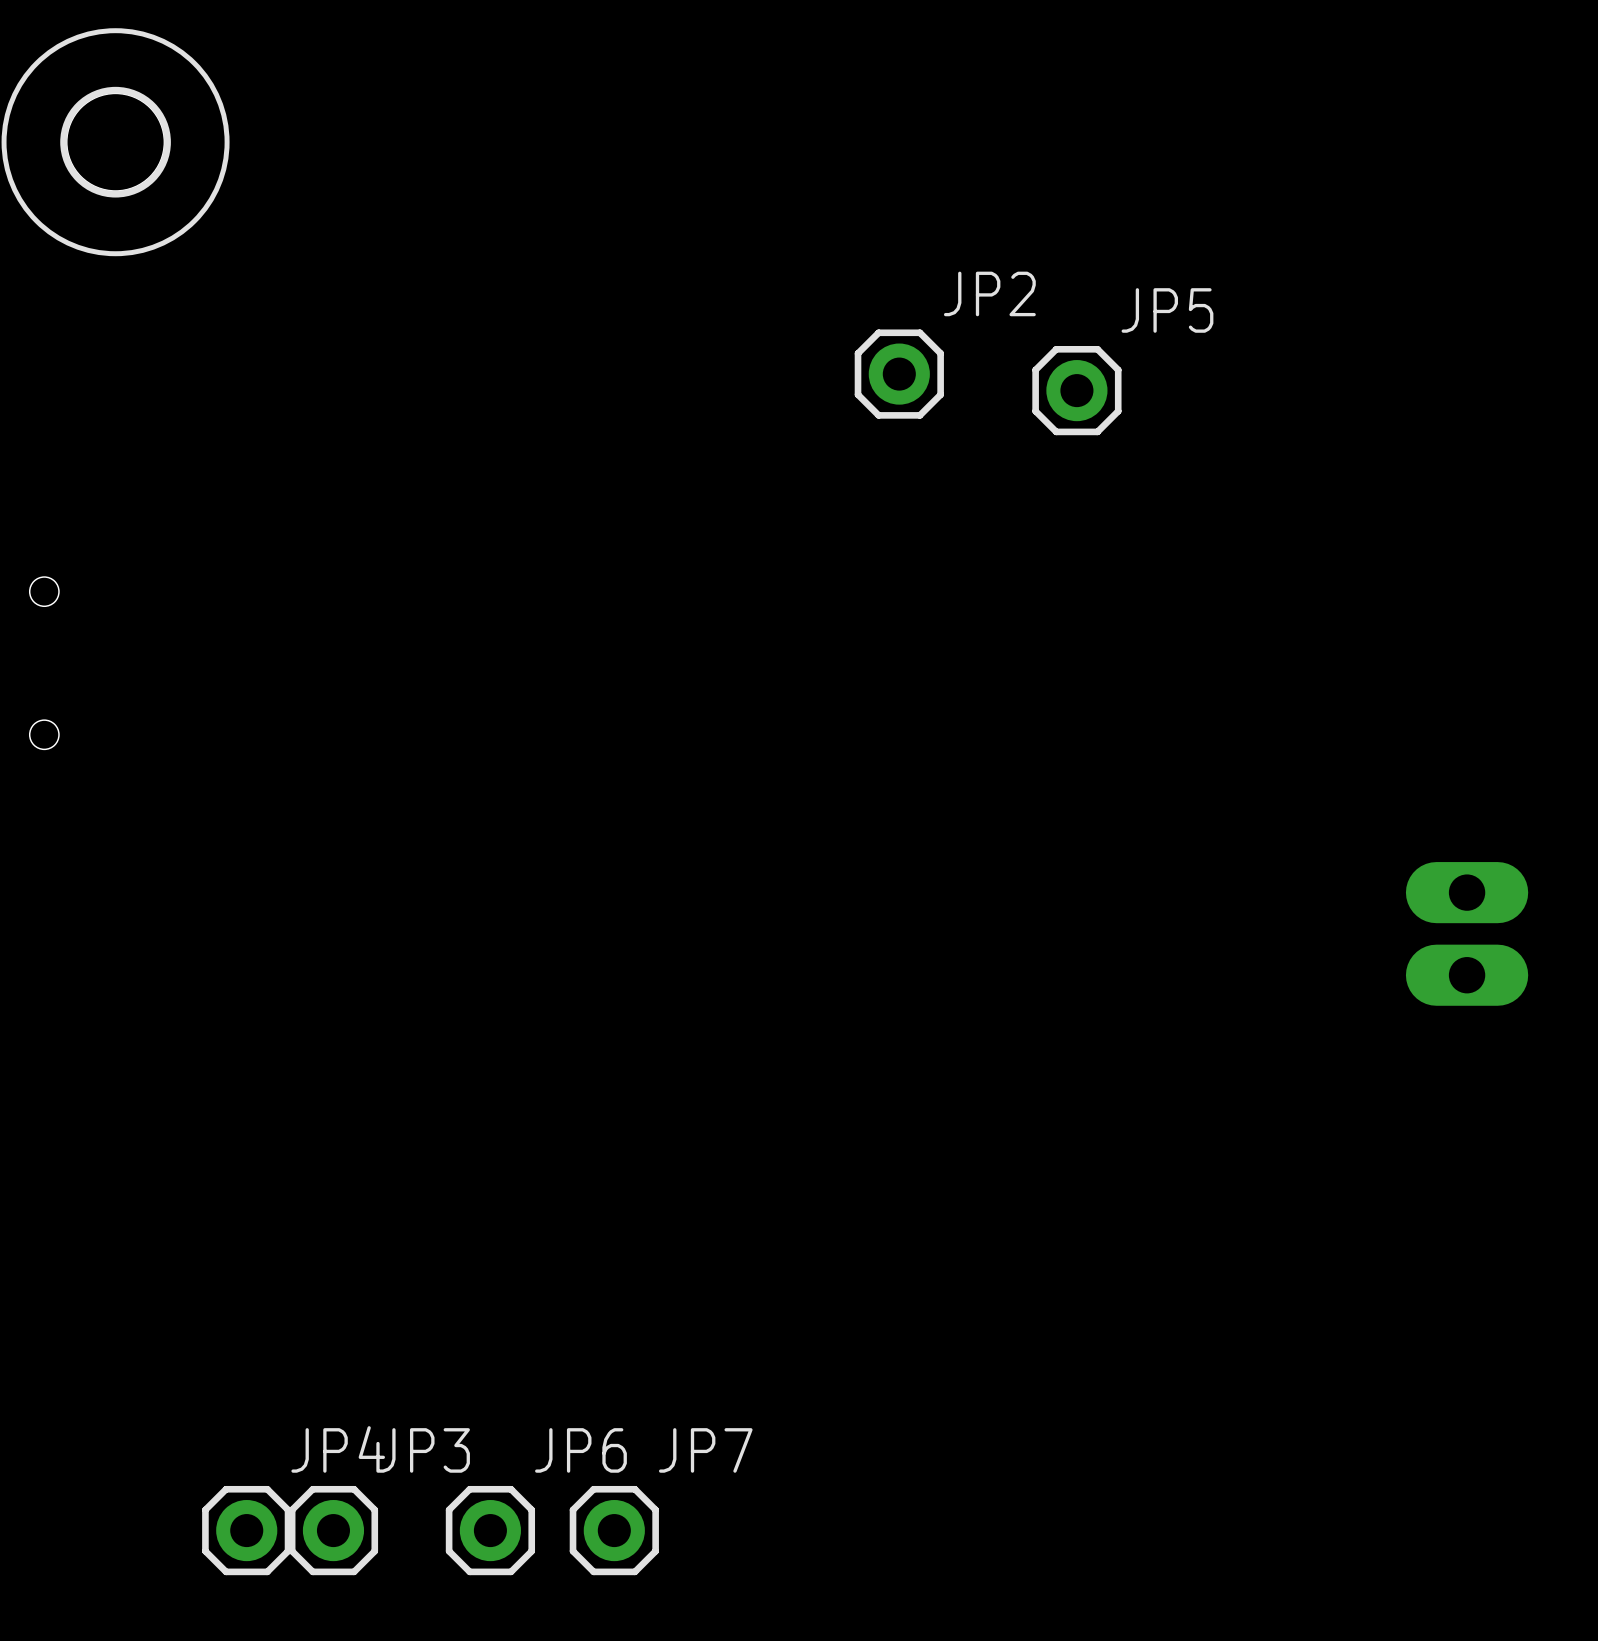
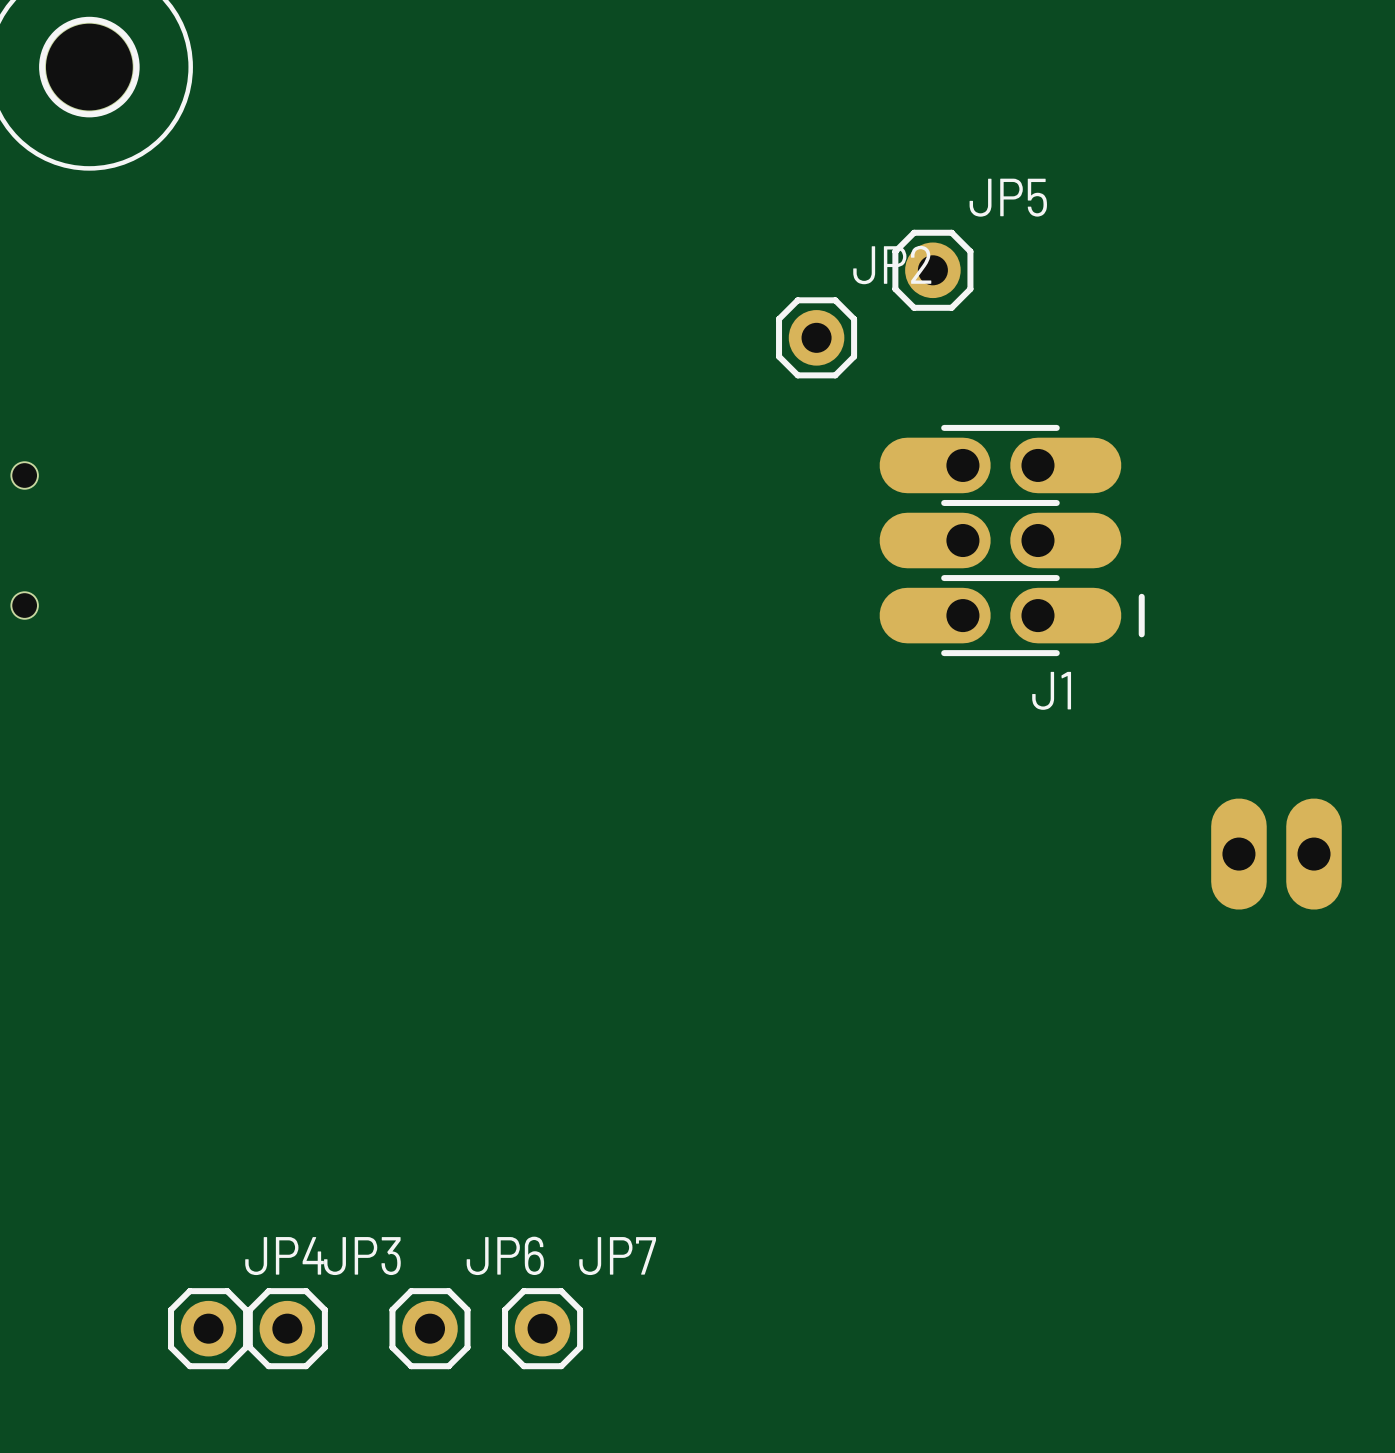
JP2 position: (899, 374) -> (816, 337)
JP5 position: (1076, 390) -> (932, 270)
J1: none -> (1012, 540)
part rotation: 0° (1467, 933) -> 90° clockwise (1276, 854)
part position: (1467, 933) -> (1276, 854)

